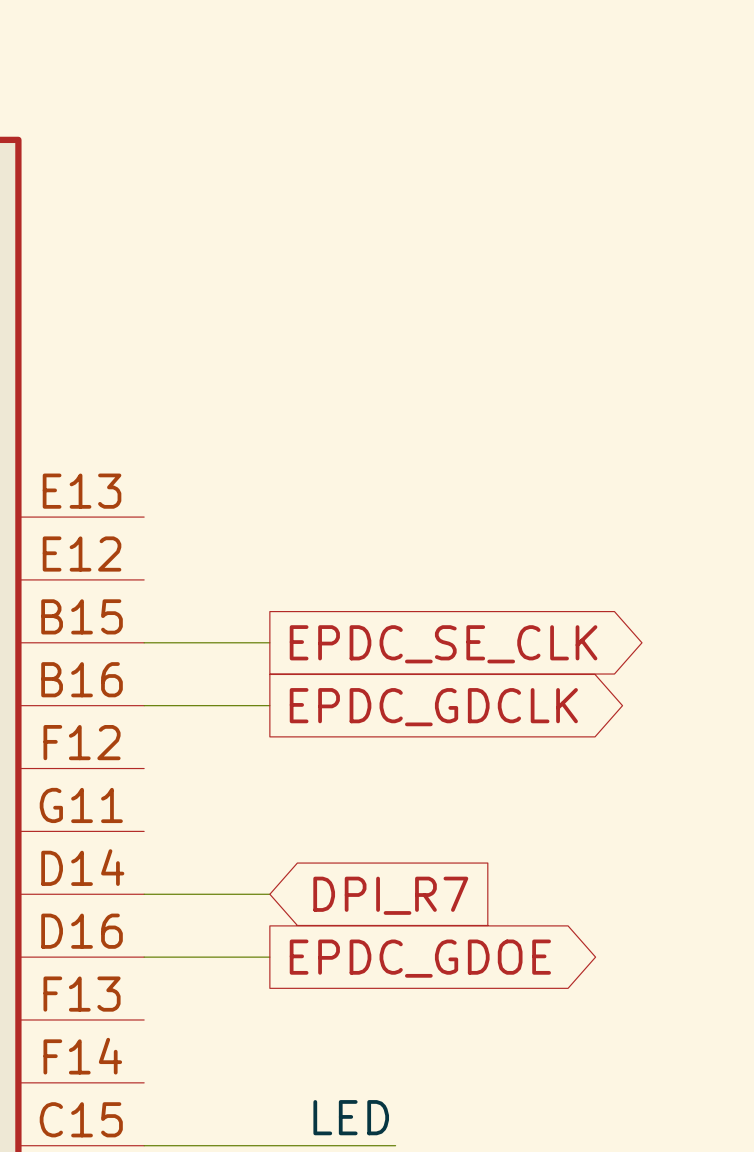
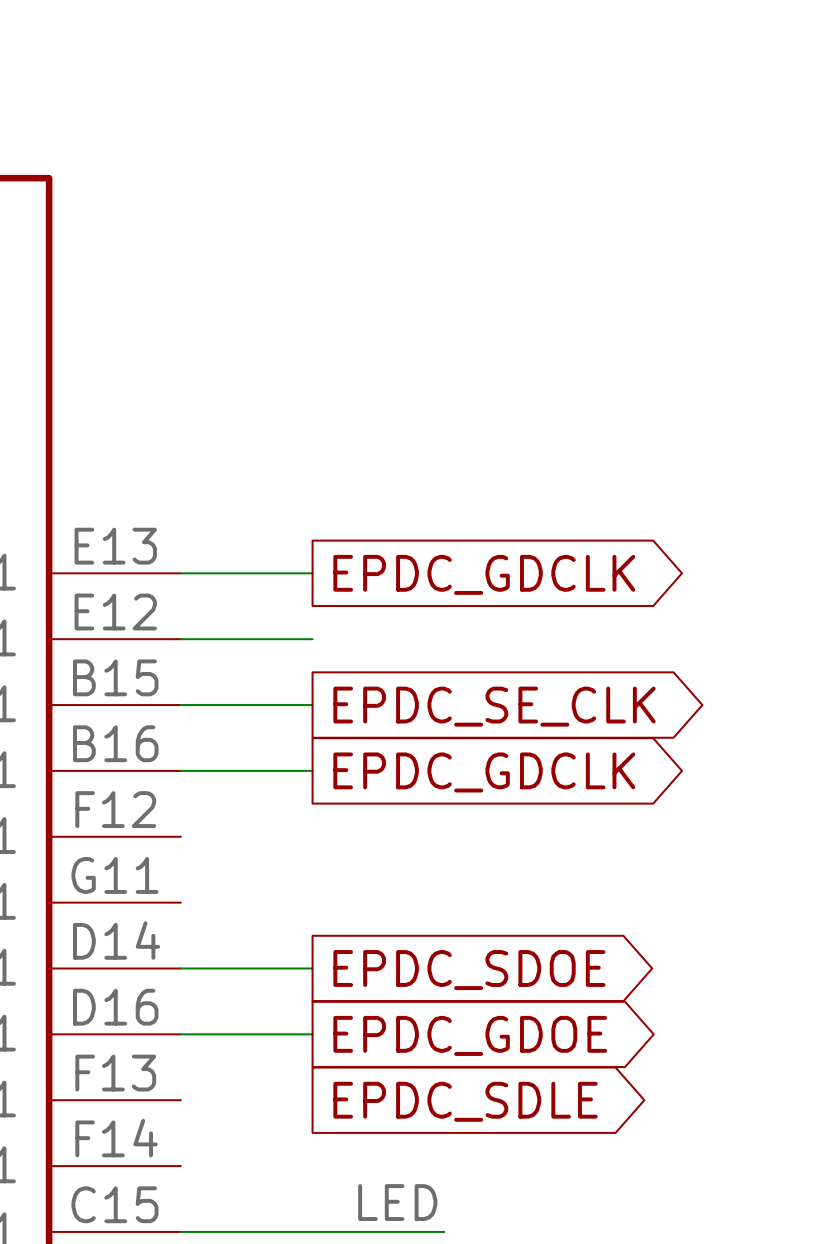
wire: none -> (180, 573) (312, 573)
global label: none -> EPDC_GDCLK (484, 574)
wire: none -> (180, 639) (312, 639)
global label shape: input (390, 895) -> output (469, 970)
global label: DPI_R7 (390, 895) -> EPDC_SDOE (469, 970)
global label: none -> EPDC_SDLE (465, 1101)

